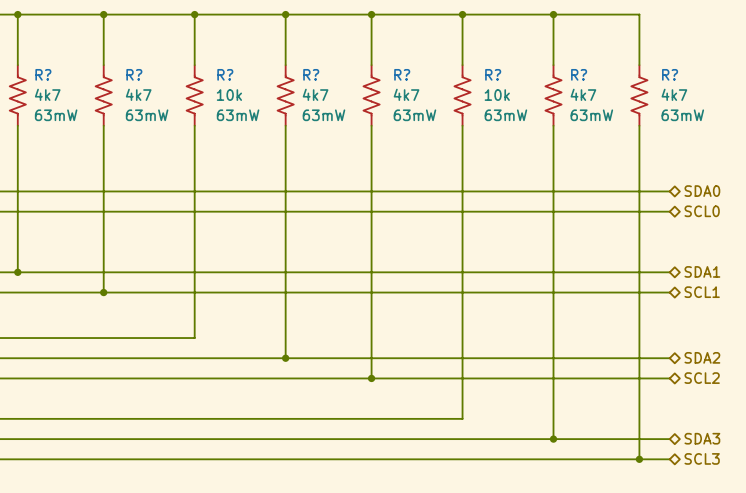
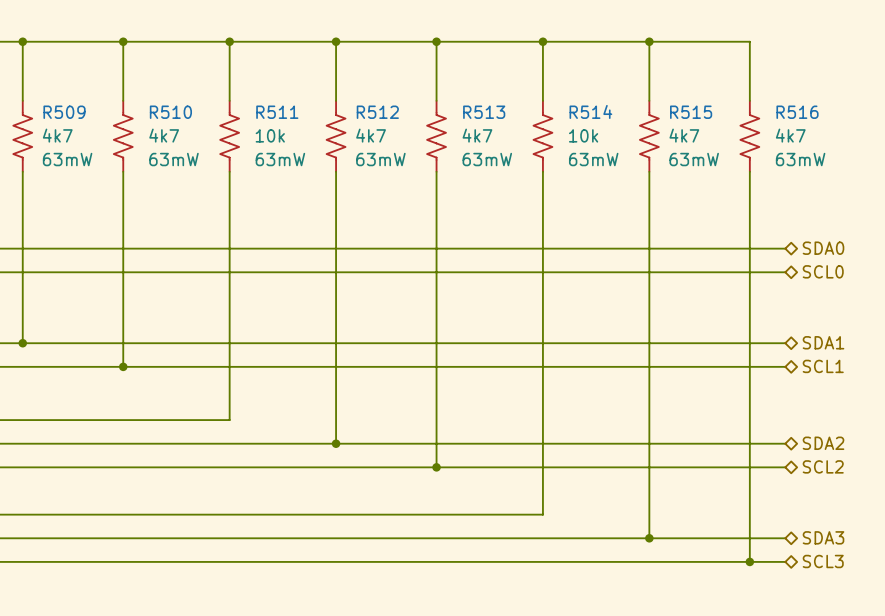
R? name: R? (43, 74) -> R509 (64, 112)
R? name: R? (134, 74) -> R510 (170, 112)
R? name: R? (225, 74) -> R511 (277, 112)
R? name: R? (311, 74) -> R512 (377, 112)
R? name: R? (402, 74) -> R513 (484, 112)
R? name: R? (493, 74) -> R514 (590, 111)
R? name: R? (579, 74) -> R515 (691, 112)
R? name: R? (670, 74) -> R516 (797, 112)

